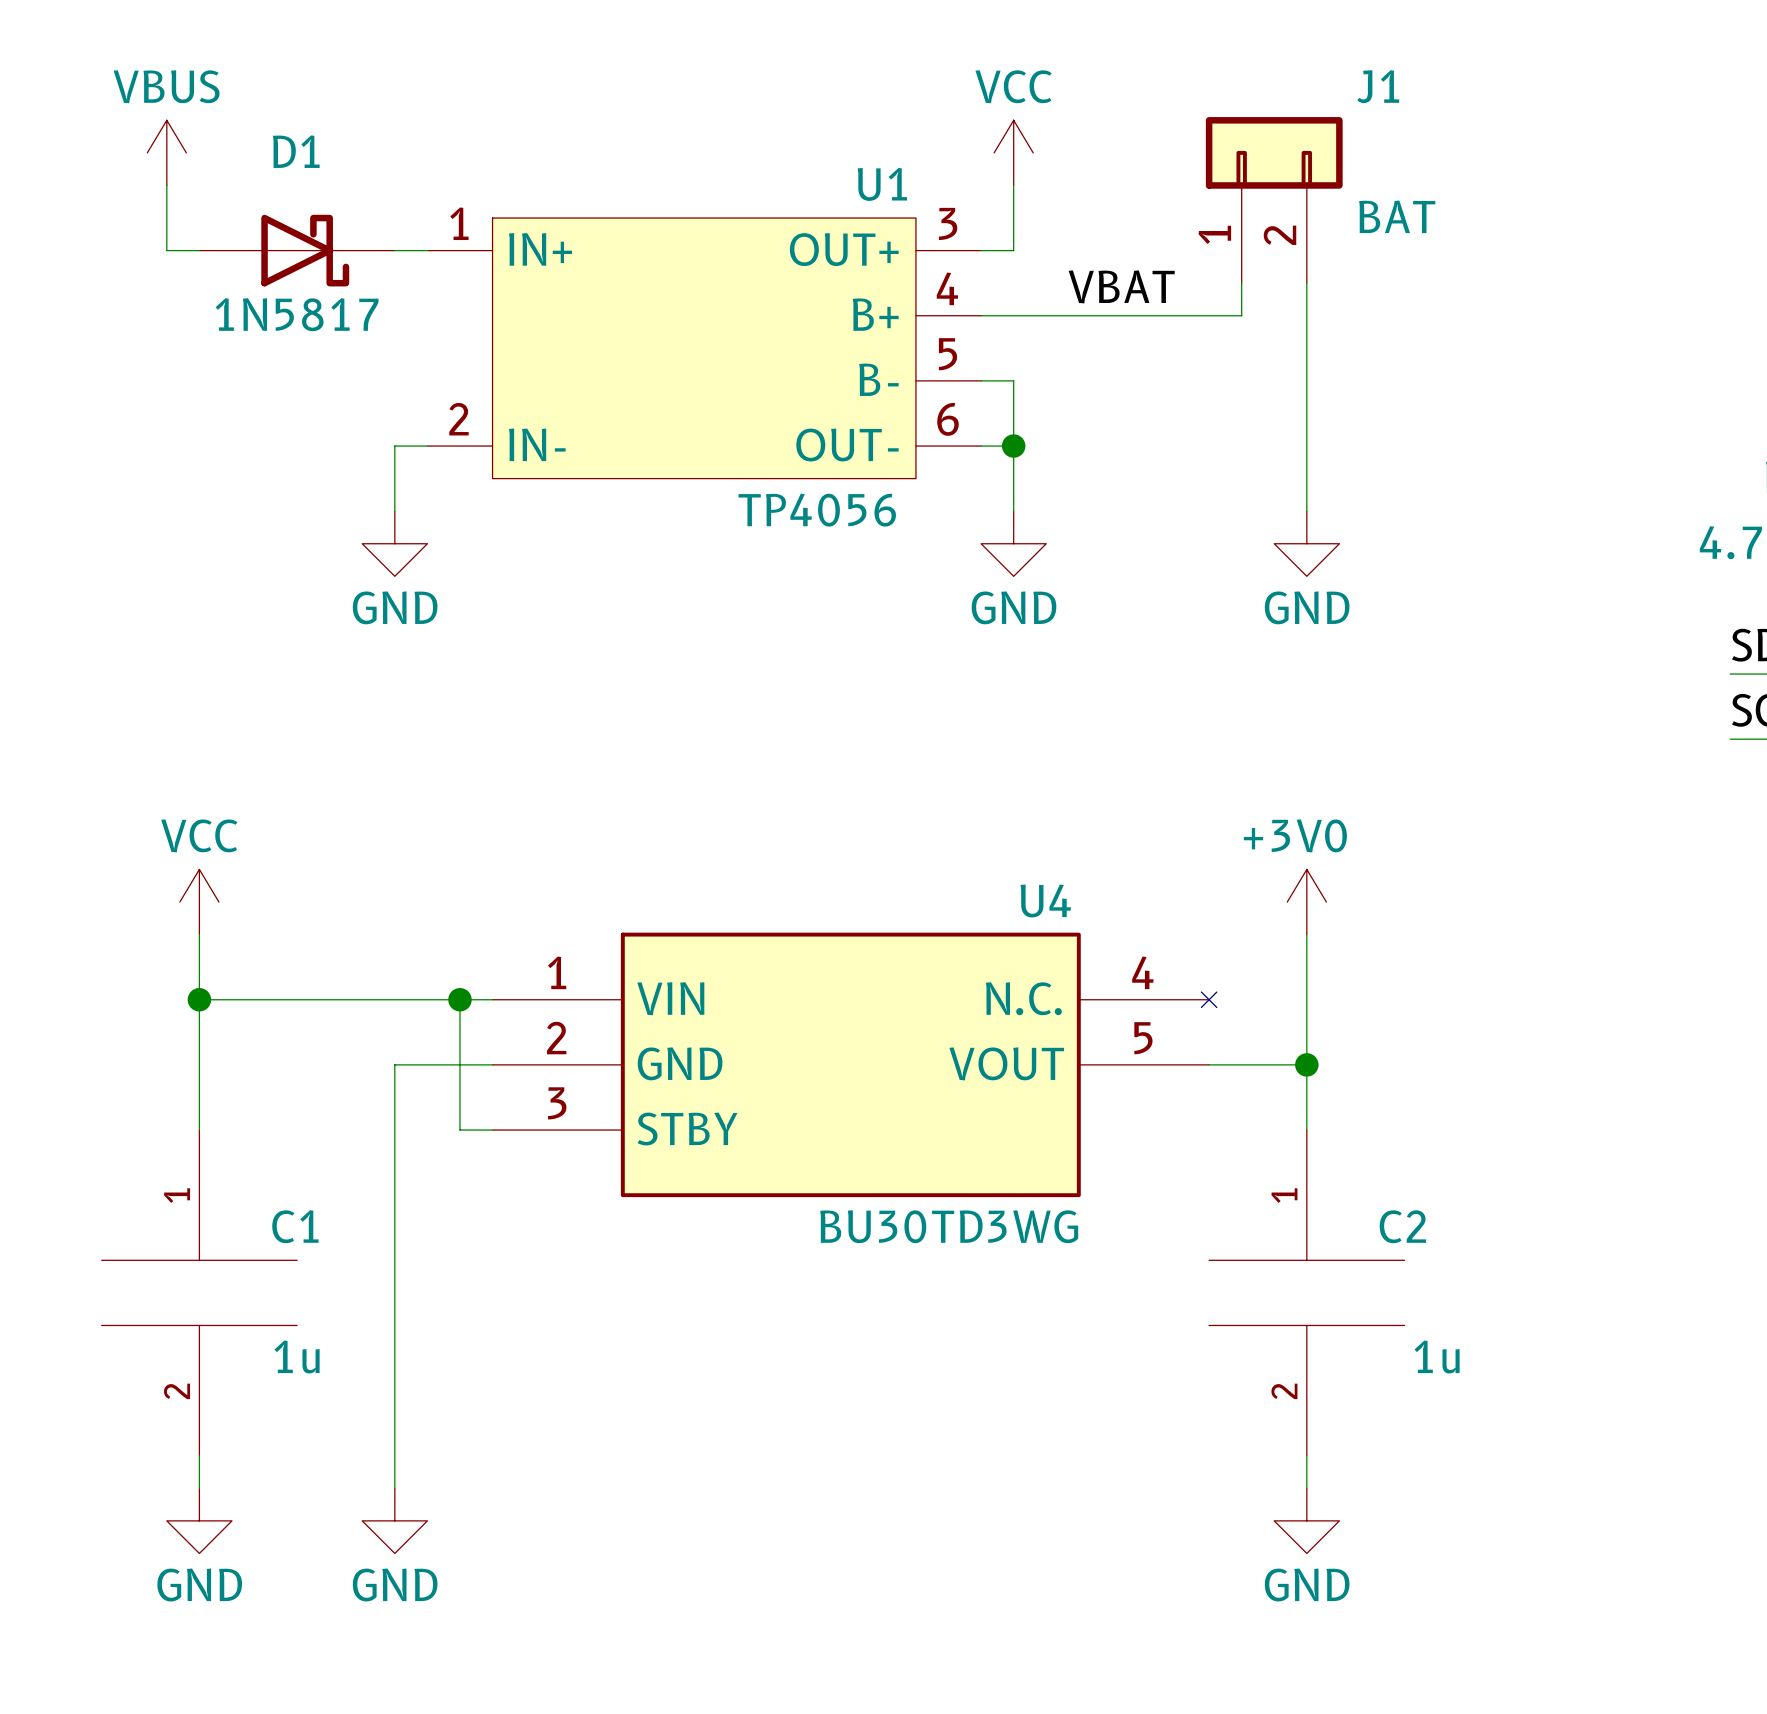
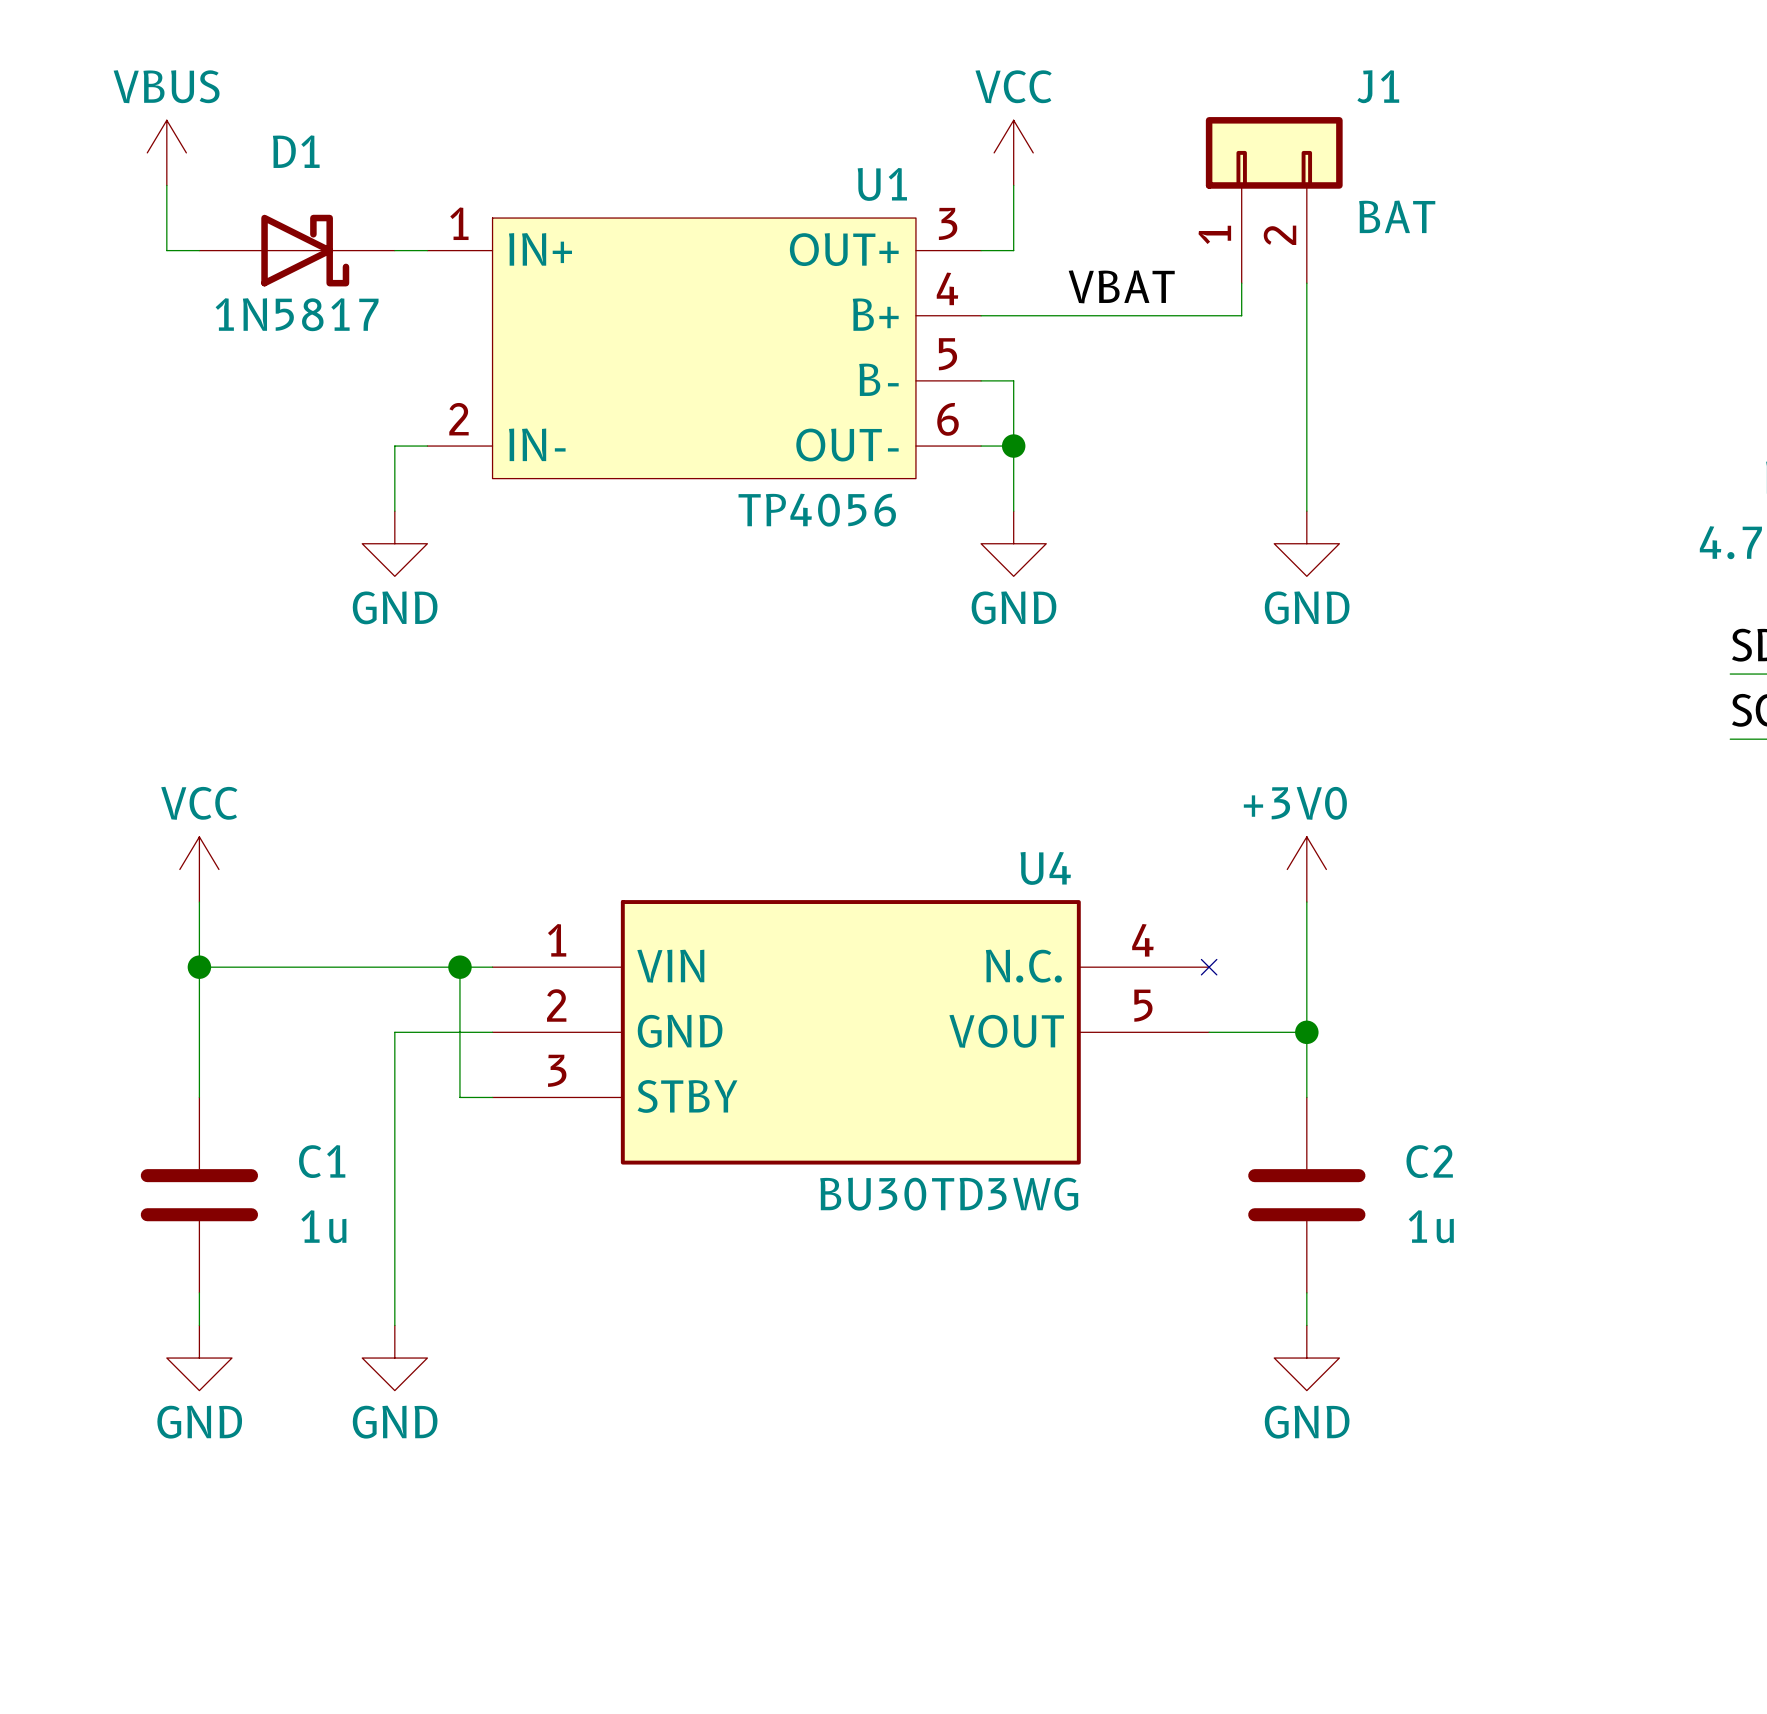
power symbol position: VCC (199, 902) -> VCC (199, 869)
power symbol position: +3V0 (1306, 902) -> +3V0 (1306, 869)
wire: none -> (459, 967) (459, 999)
wire: (199, 999) (492, 999) -> (199, 967) (492, 967)
junction position: (199, 999) -> (199, 967)
junction position: (459, 999) -> (459, 967)
wire: (394, 1064) (492, 1064) -> (394, 1064) (394, 1032) (492, 1032)
U4 position: (854, 1064) -> (854, 1032)
wire: (1209, 1064) (1306, 1064) -> (1209, 1032) (1306, 1032)
junction position: (1306, 1064) -> (1306, 1032)
wire: (459, 1097) (459, 1130) (492, 1130) -> (459, 1097) (492, 1097)
C1 symbol: [101, 1130, 298, 1456] -> [140, 1097, 259, 1293]
C2 symbol: [1209, 1130, 1405, 1456] -> [1248, 1097, 1366, 1293]
C1 name position: C1 (295, 1226) -> C1 (322, 1161)
C2 name position: C2 (1402, 1226) -> C2 (1429, 1161)
wire: (394, 1325) (394, 1488) -> none
power symbol: none -> GND (199, 1358)
power symbol: none -> GND (394, 1358)
wire: (199, 1455) (199, 1488) -> (199, 1292) (199, 1325)
wire: (1306, 1455) (1306, 1488) -> (1306, 1292) (1306, 1325)
power symbol: GND (199, 1520) -> none
power symbol: GND (394, 1520) -> none
power symbol position: GND (1306, 1520) -> GND (1306, 1358)

